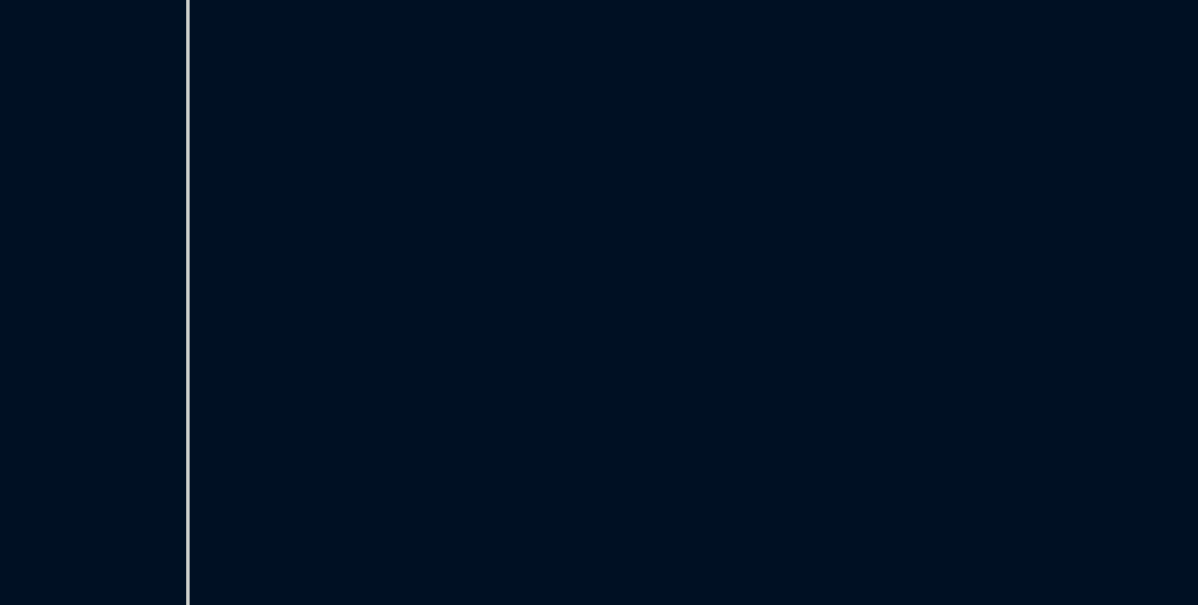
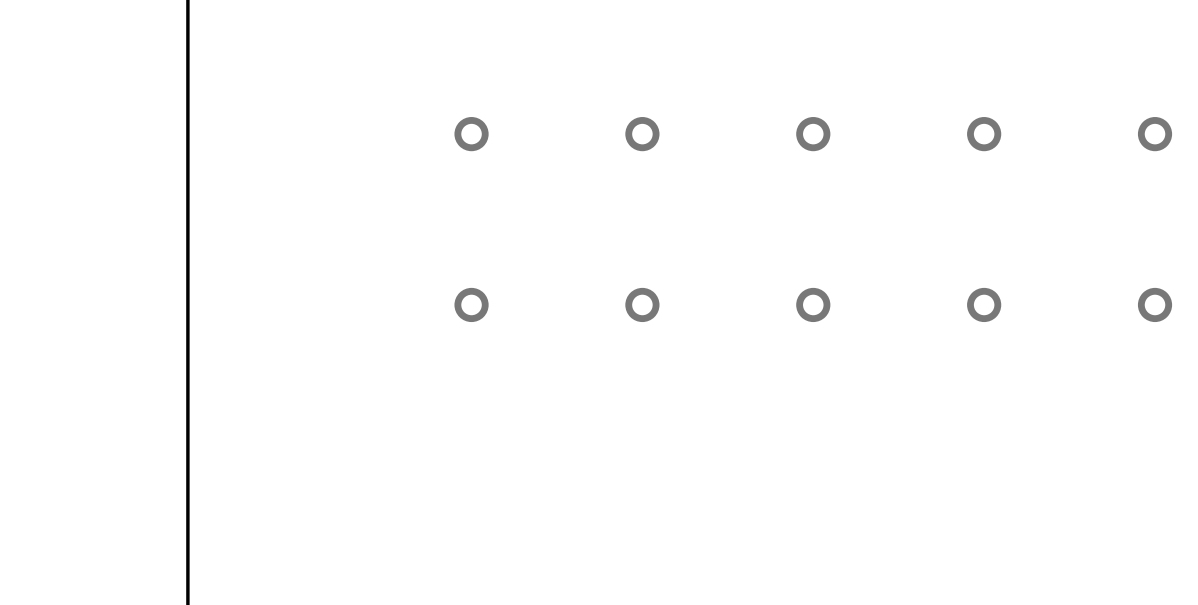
via: none -> (471, 134)
via: none -> (642, 134)
via: none -> (813, 134)
via: none -> (984, 134)
via: none -> (1155, 134)
via: none -> (471, 304)
via: none -> (642, 304)
via: none -> (813, 304)
via: none -> (984, 304)
via: none -> (1155, 304)

